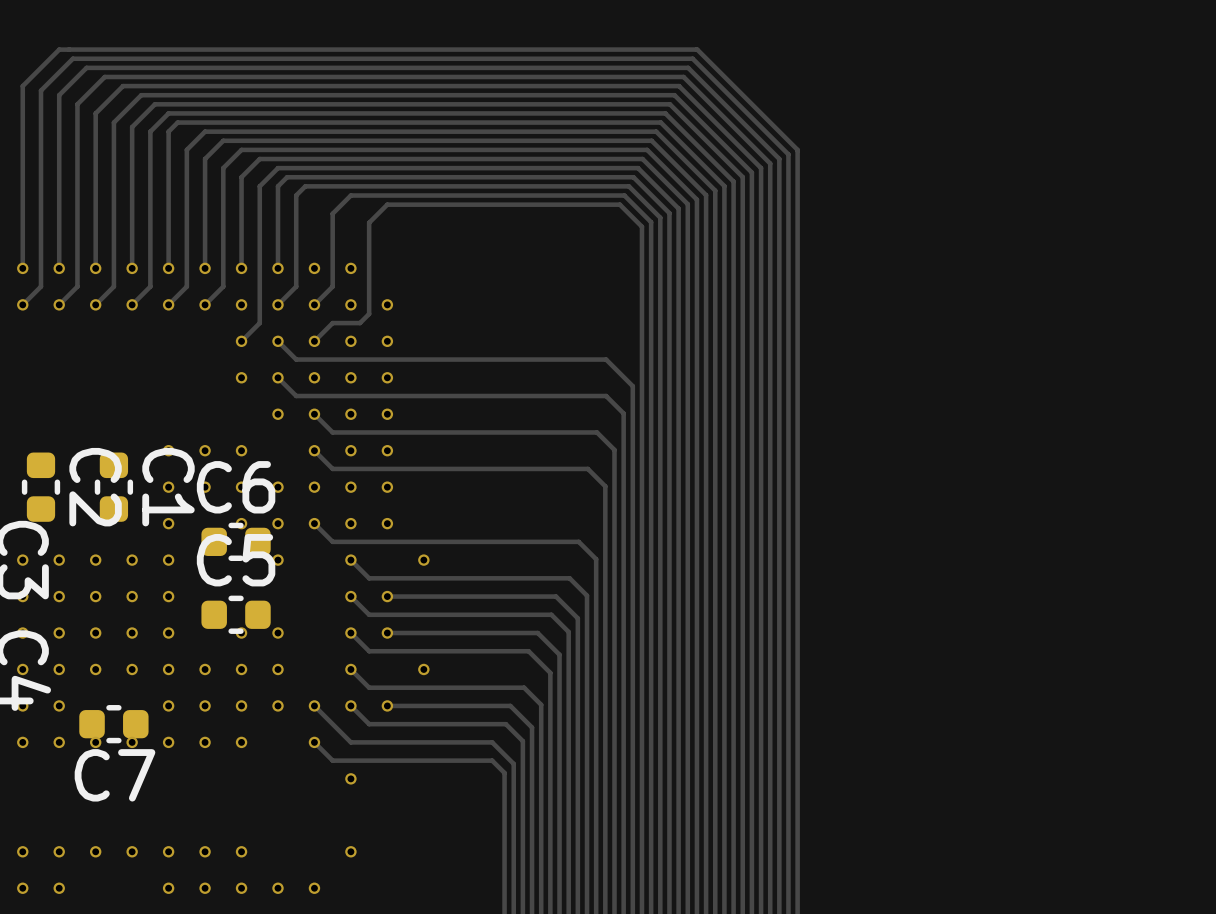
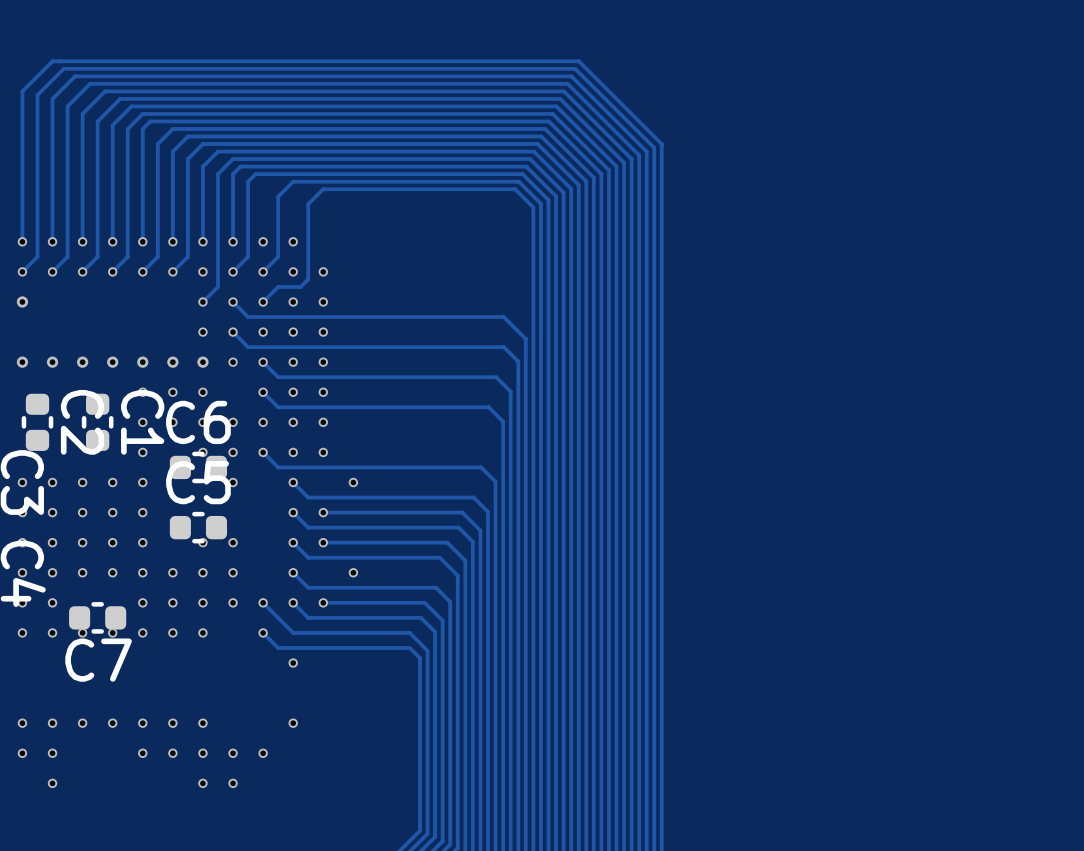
via: none -> (22, 301)
via: none -> (22, 362)
via: none -> (52, 362)
via: none -> (82, 362)
via: none -> (112, 362)
via: none -> (142, 362)
via: none -> (172, 362)
via: none -> (202, 362)

